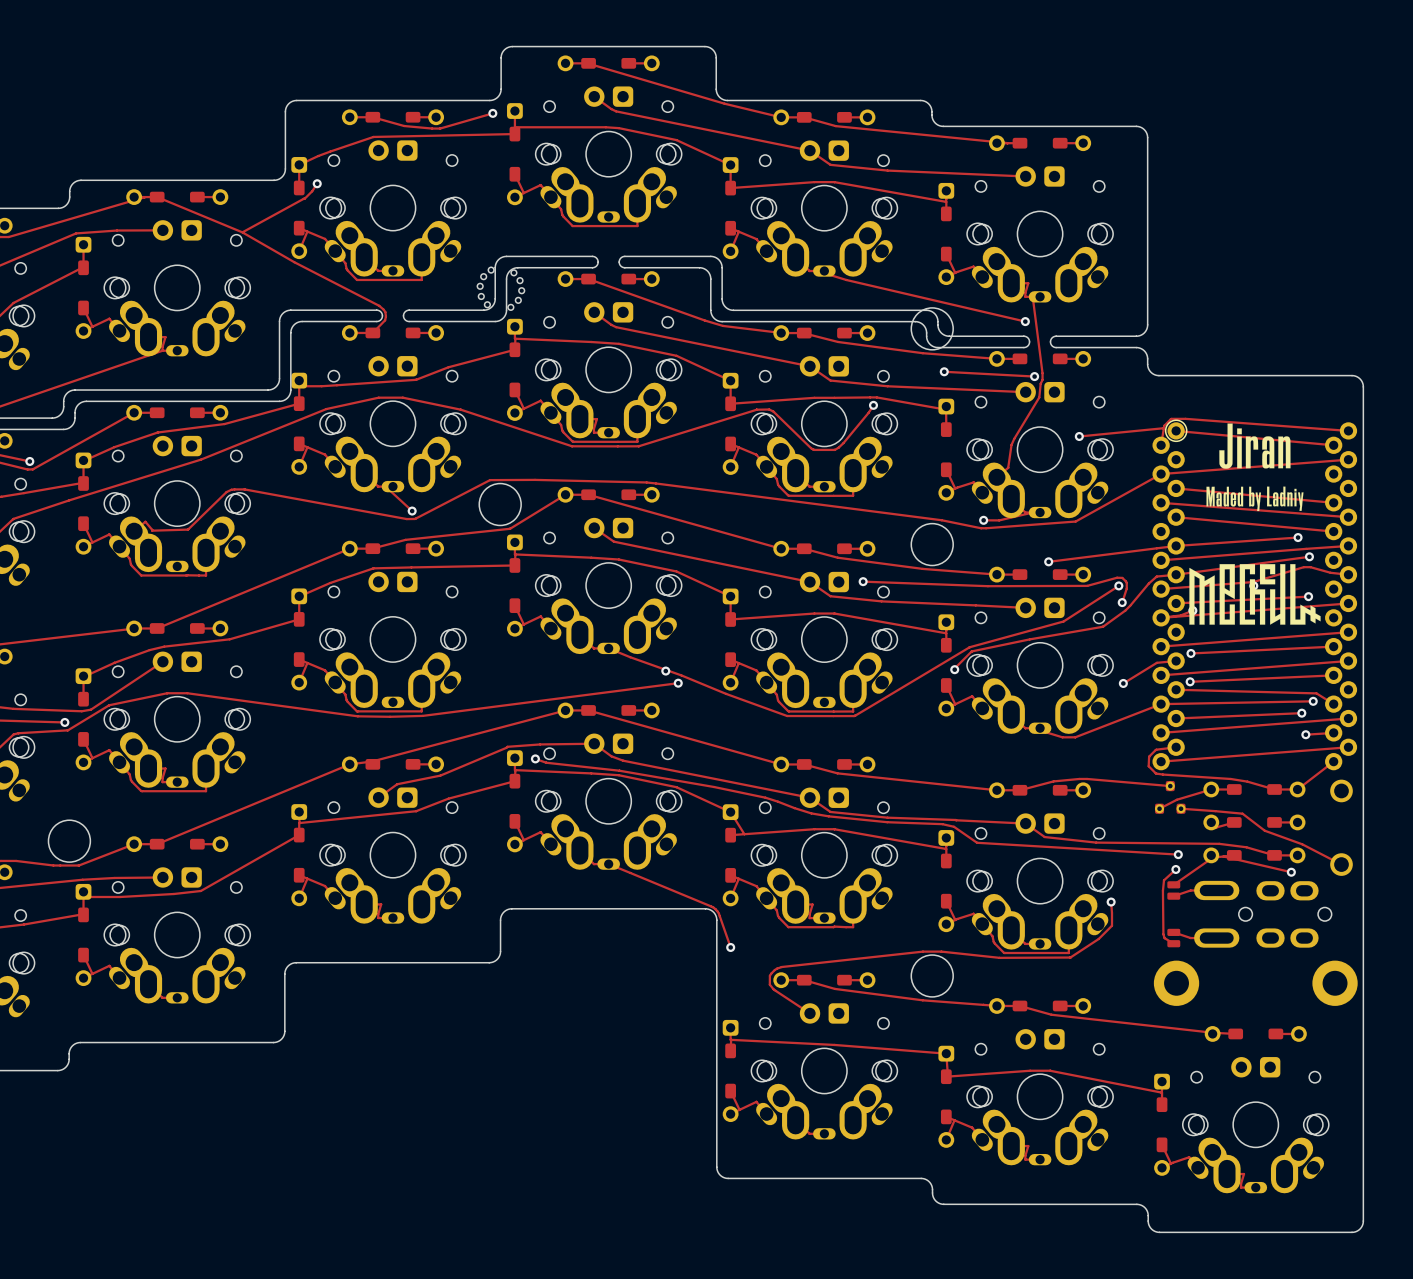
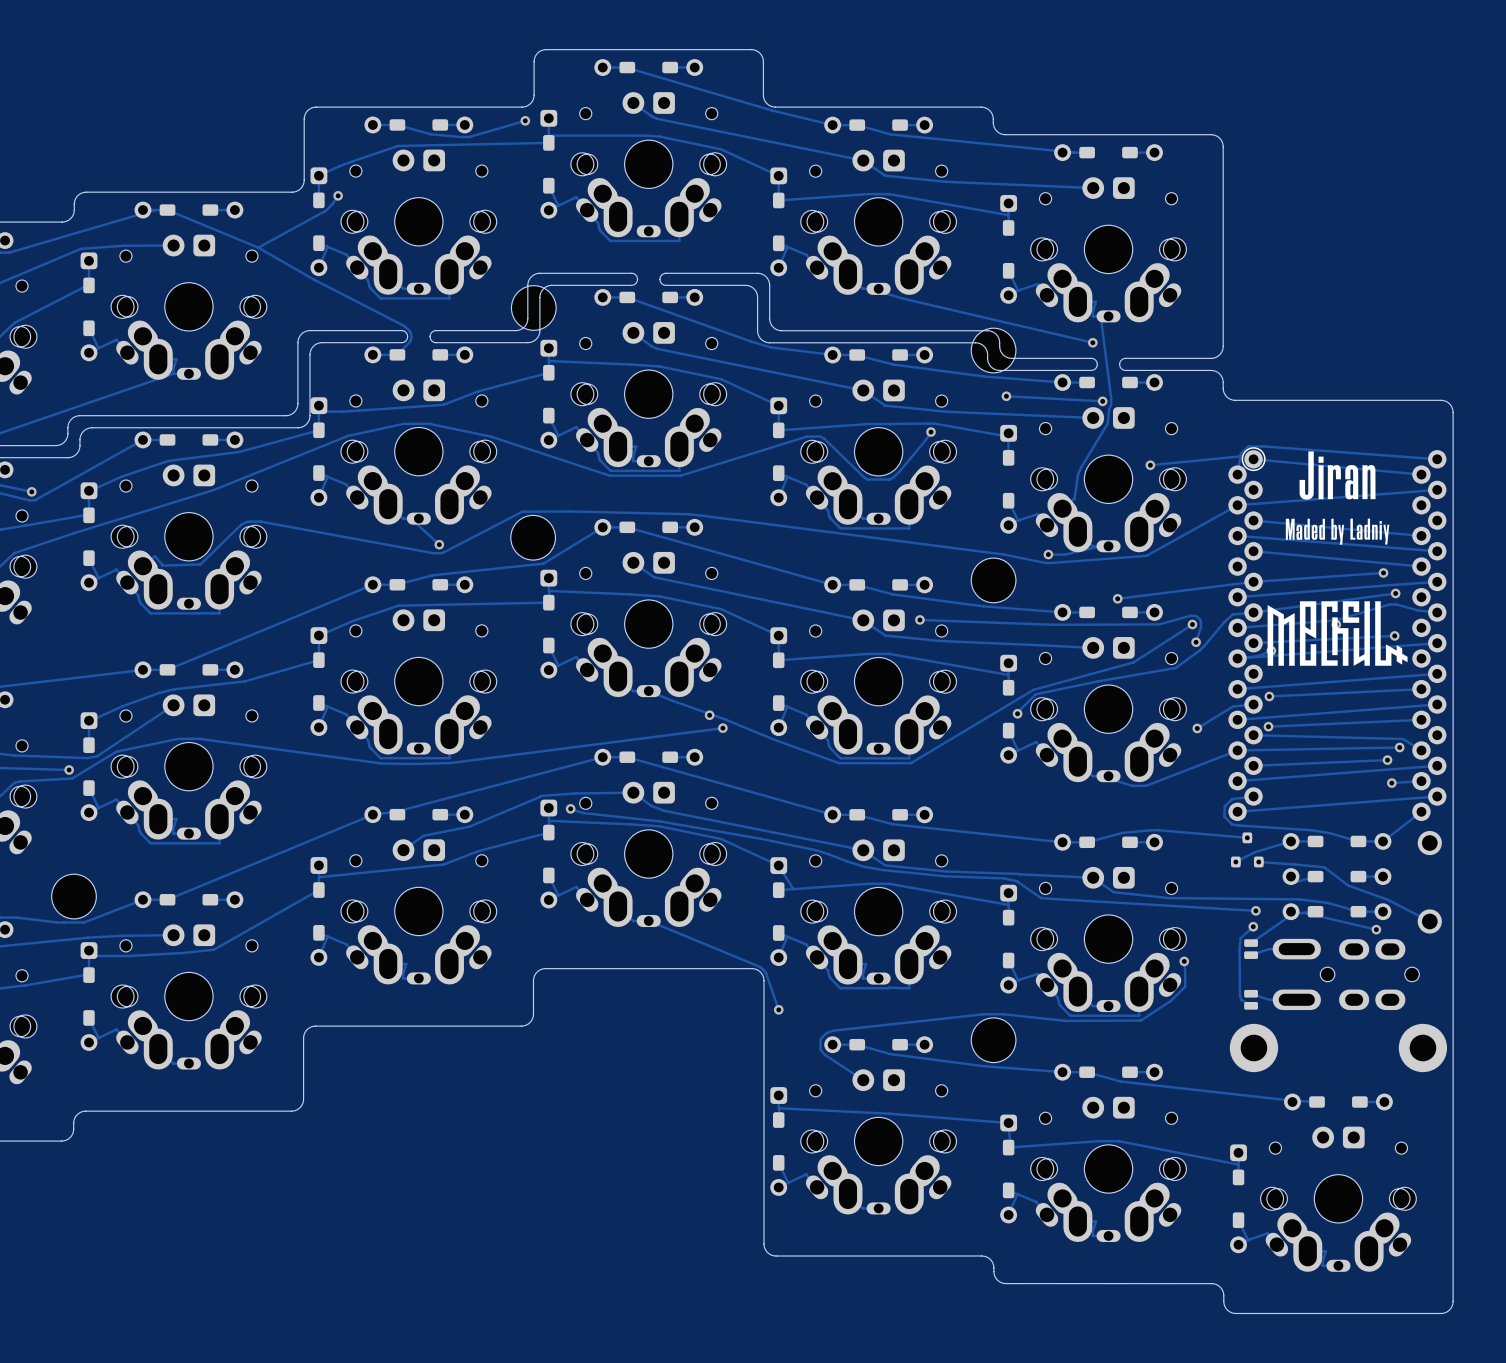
part: (491, 270) -> none
part: (513, 272) -> none
part: (483, 276) -> none
part: (520, 280) -> none
part: (480, 286) -> none
part: none -> (533, 307)
part: (521, 290) -> none
part: (481, 296) -> none
part: (518, 300) -> none
part: (487, 304) -> none
part: (510, 307) -> none

